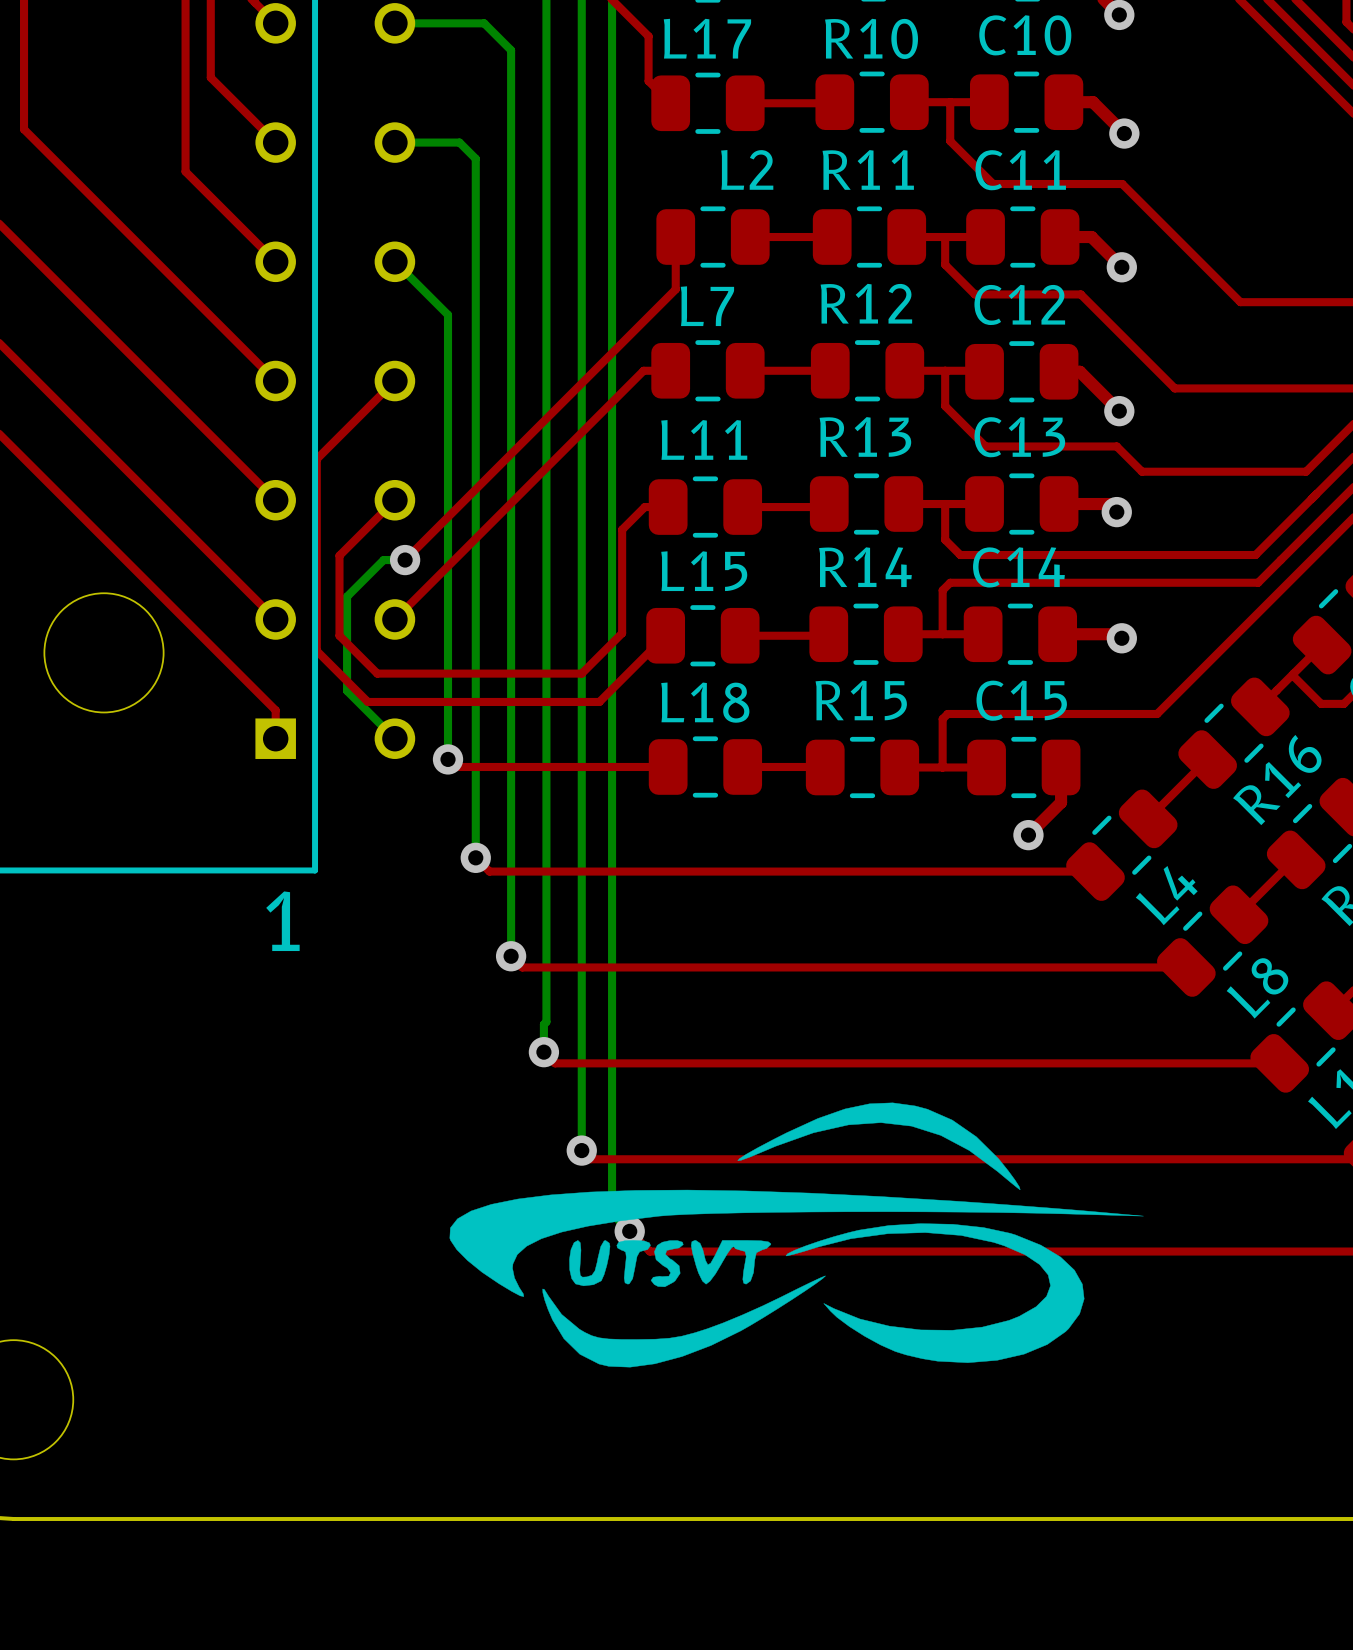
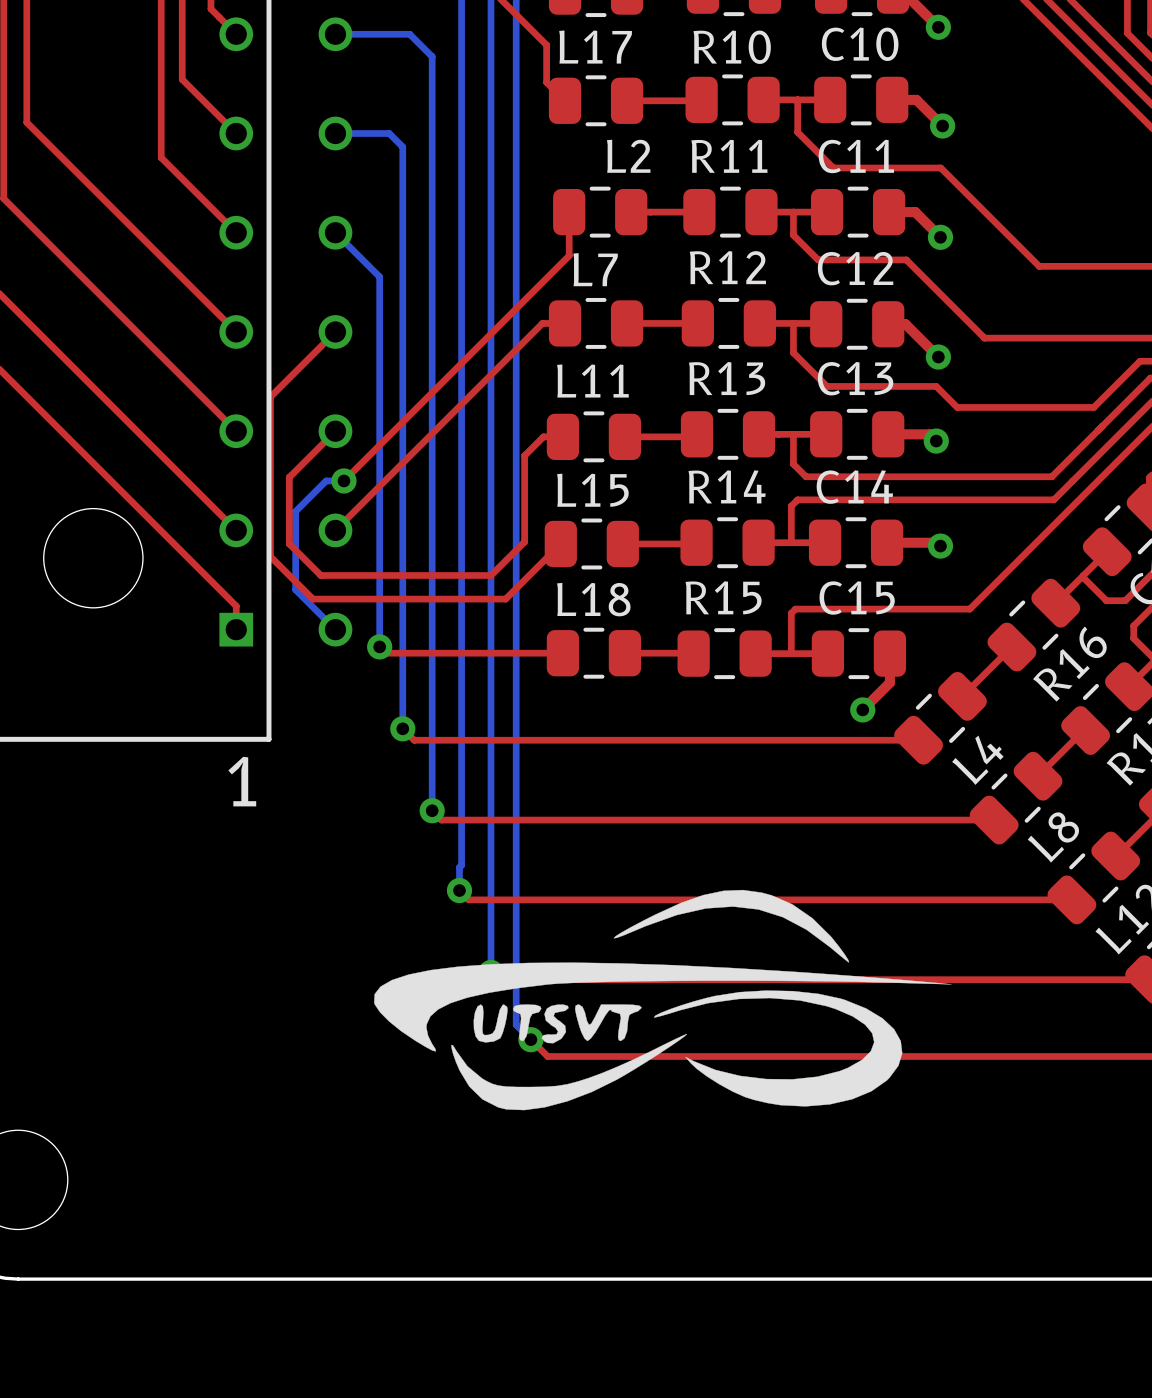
drawing position: (796, 1235) -> (662, 1000)

